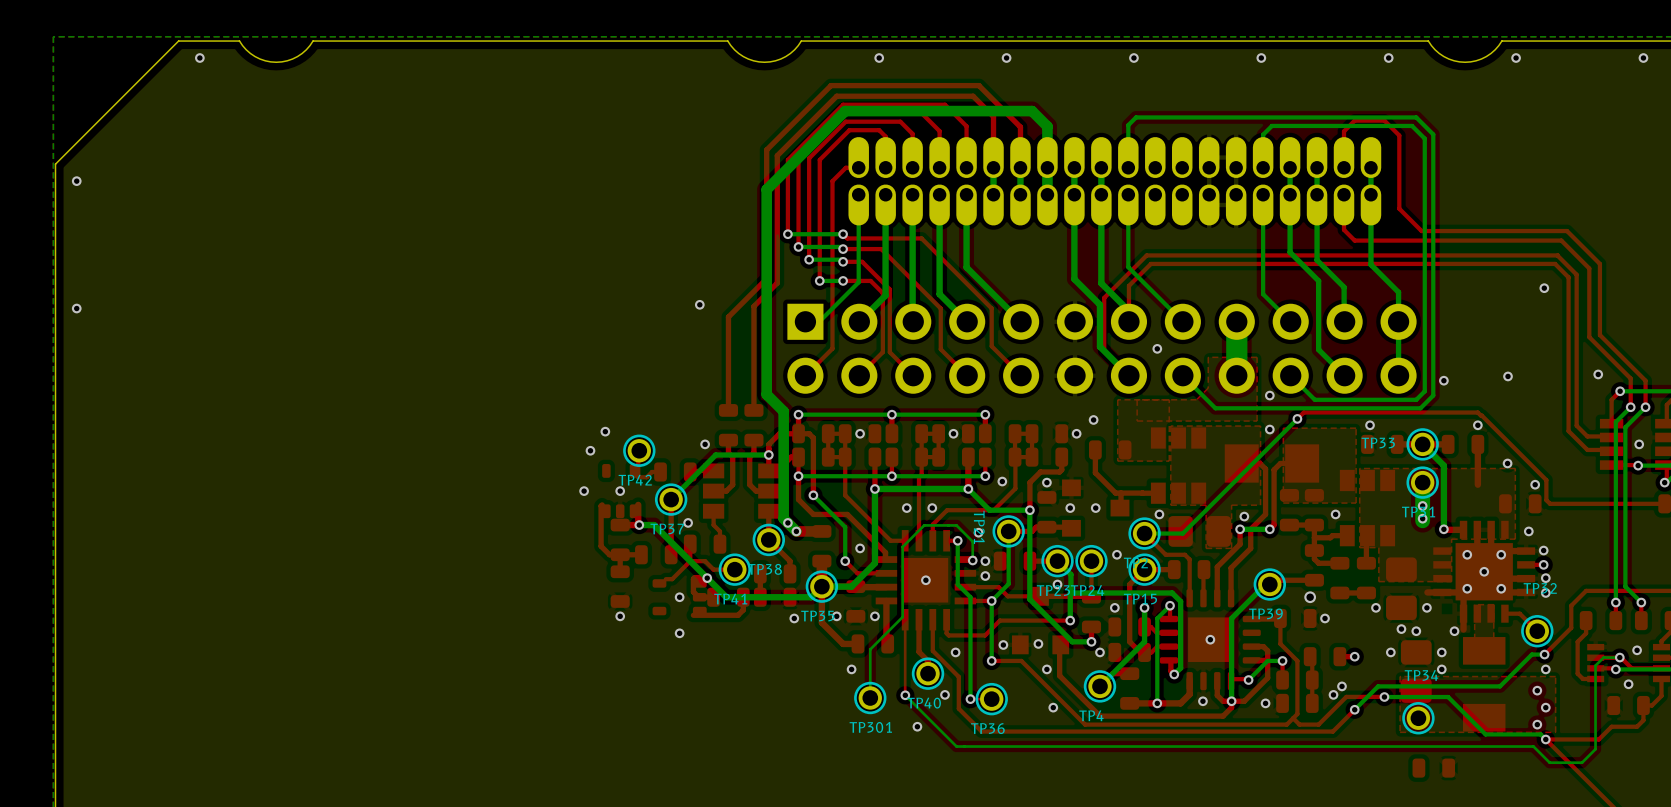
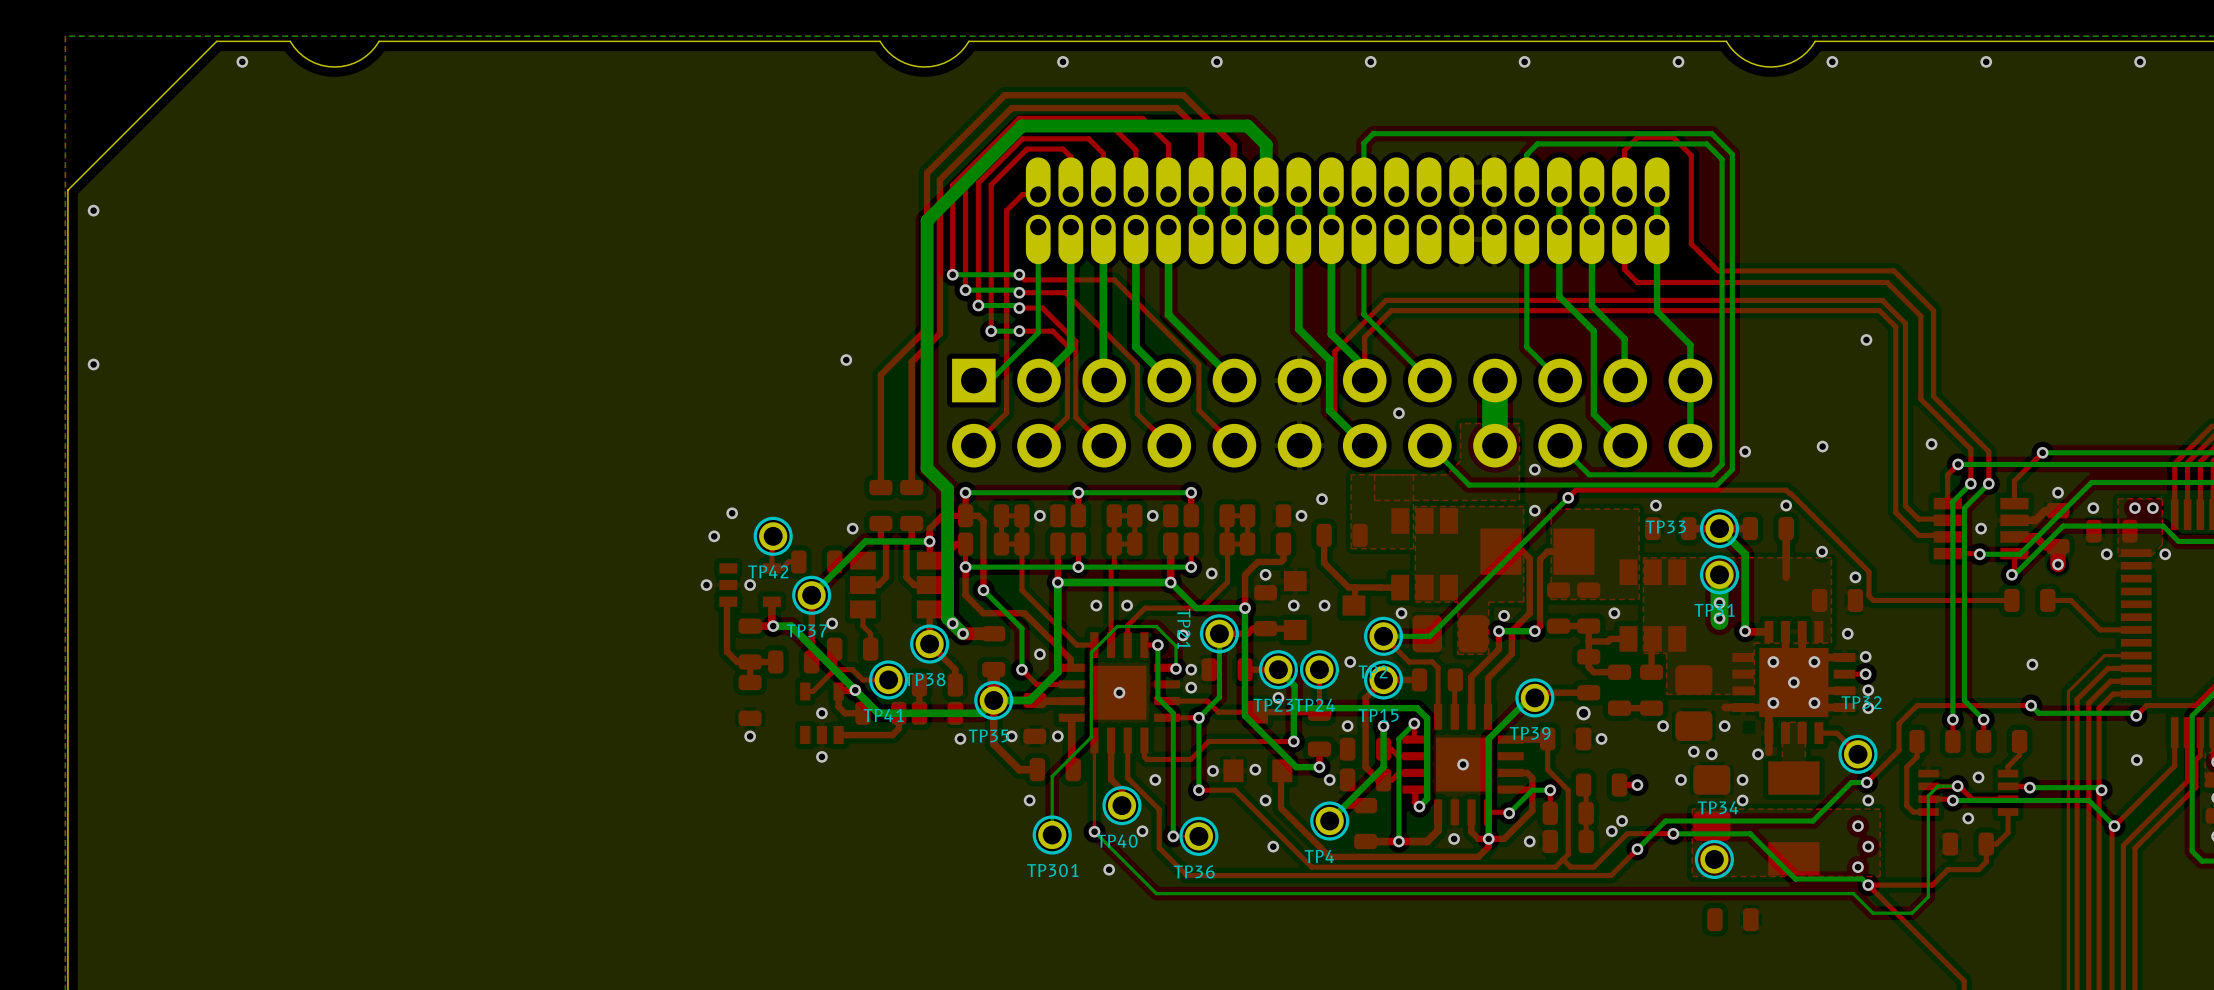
part footprint: [602, 464, 639, 519] -> [719, 563, 781, 607]
part footprint: [652, 579, 707, 616] -> [800, 682, 844, 745]
part footprint: [1159, 589, 1261, 691] -> [1402, 703, 1524, 826]

